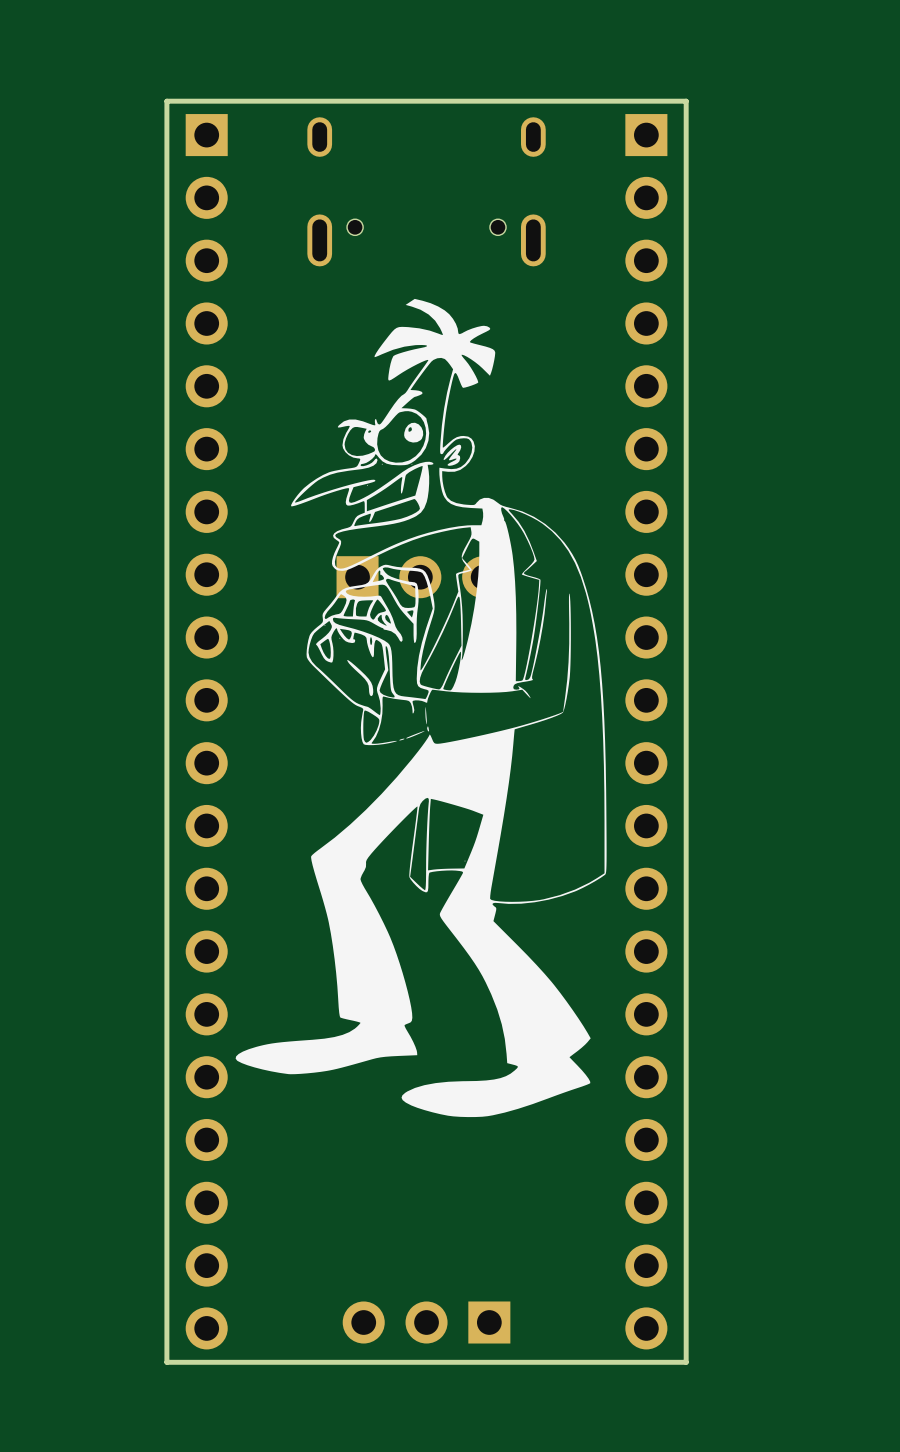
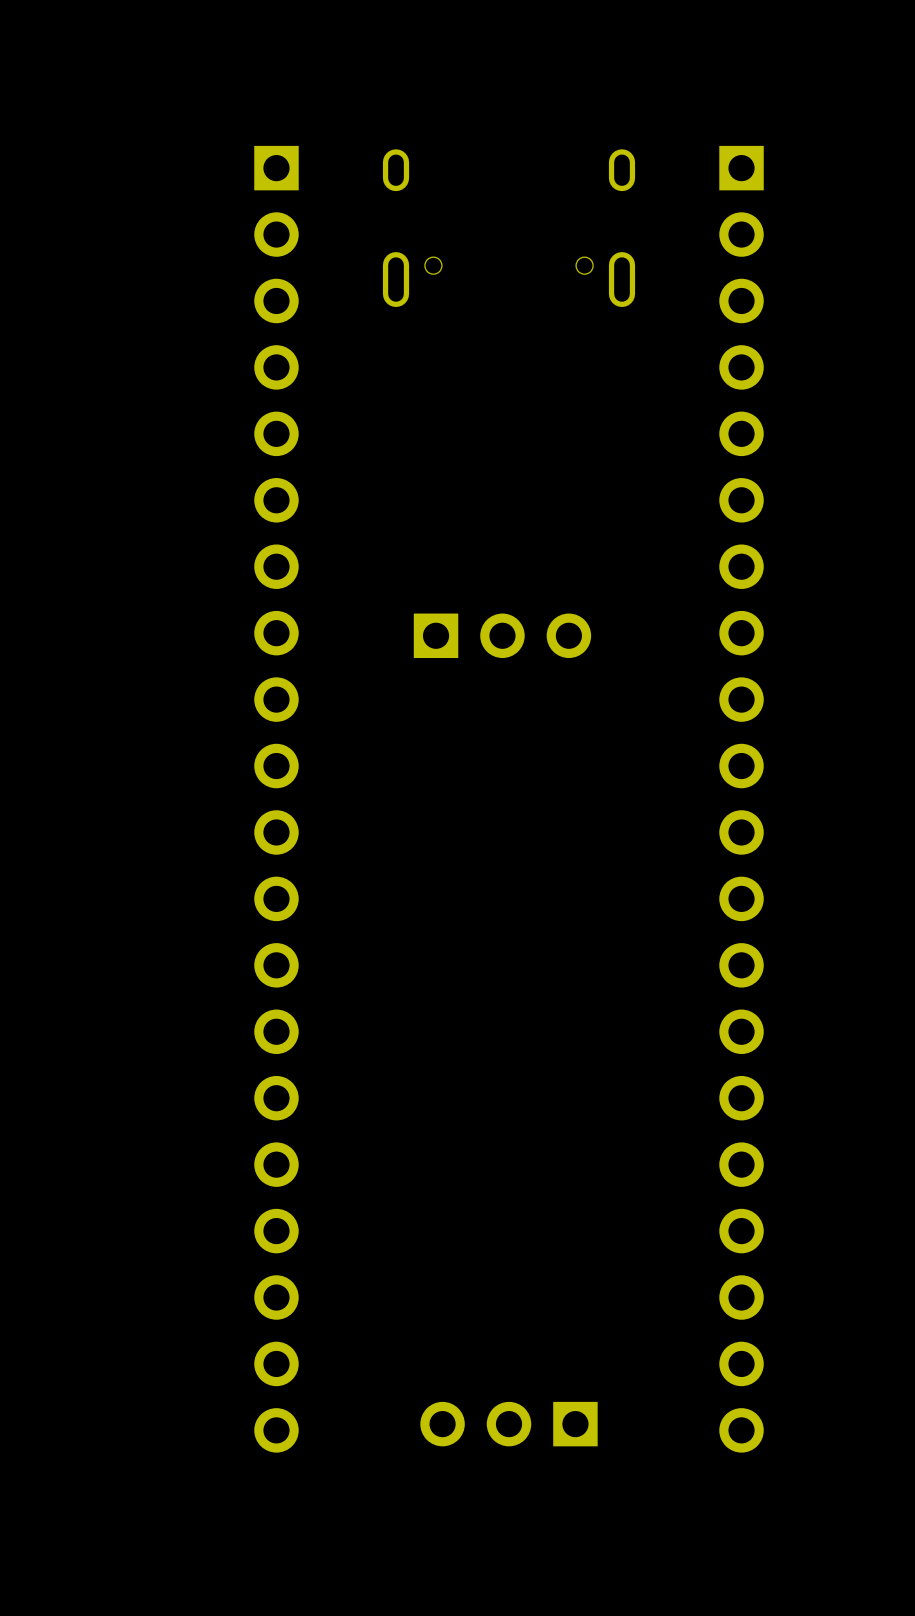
board edge: (686, 101) (166, 101) (166, 1362) (686, 1362) (686, 101) -> none
drawing: [235, 298, 607, 1118] -> none

